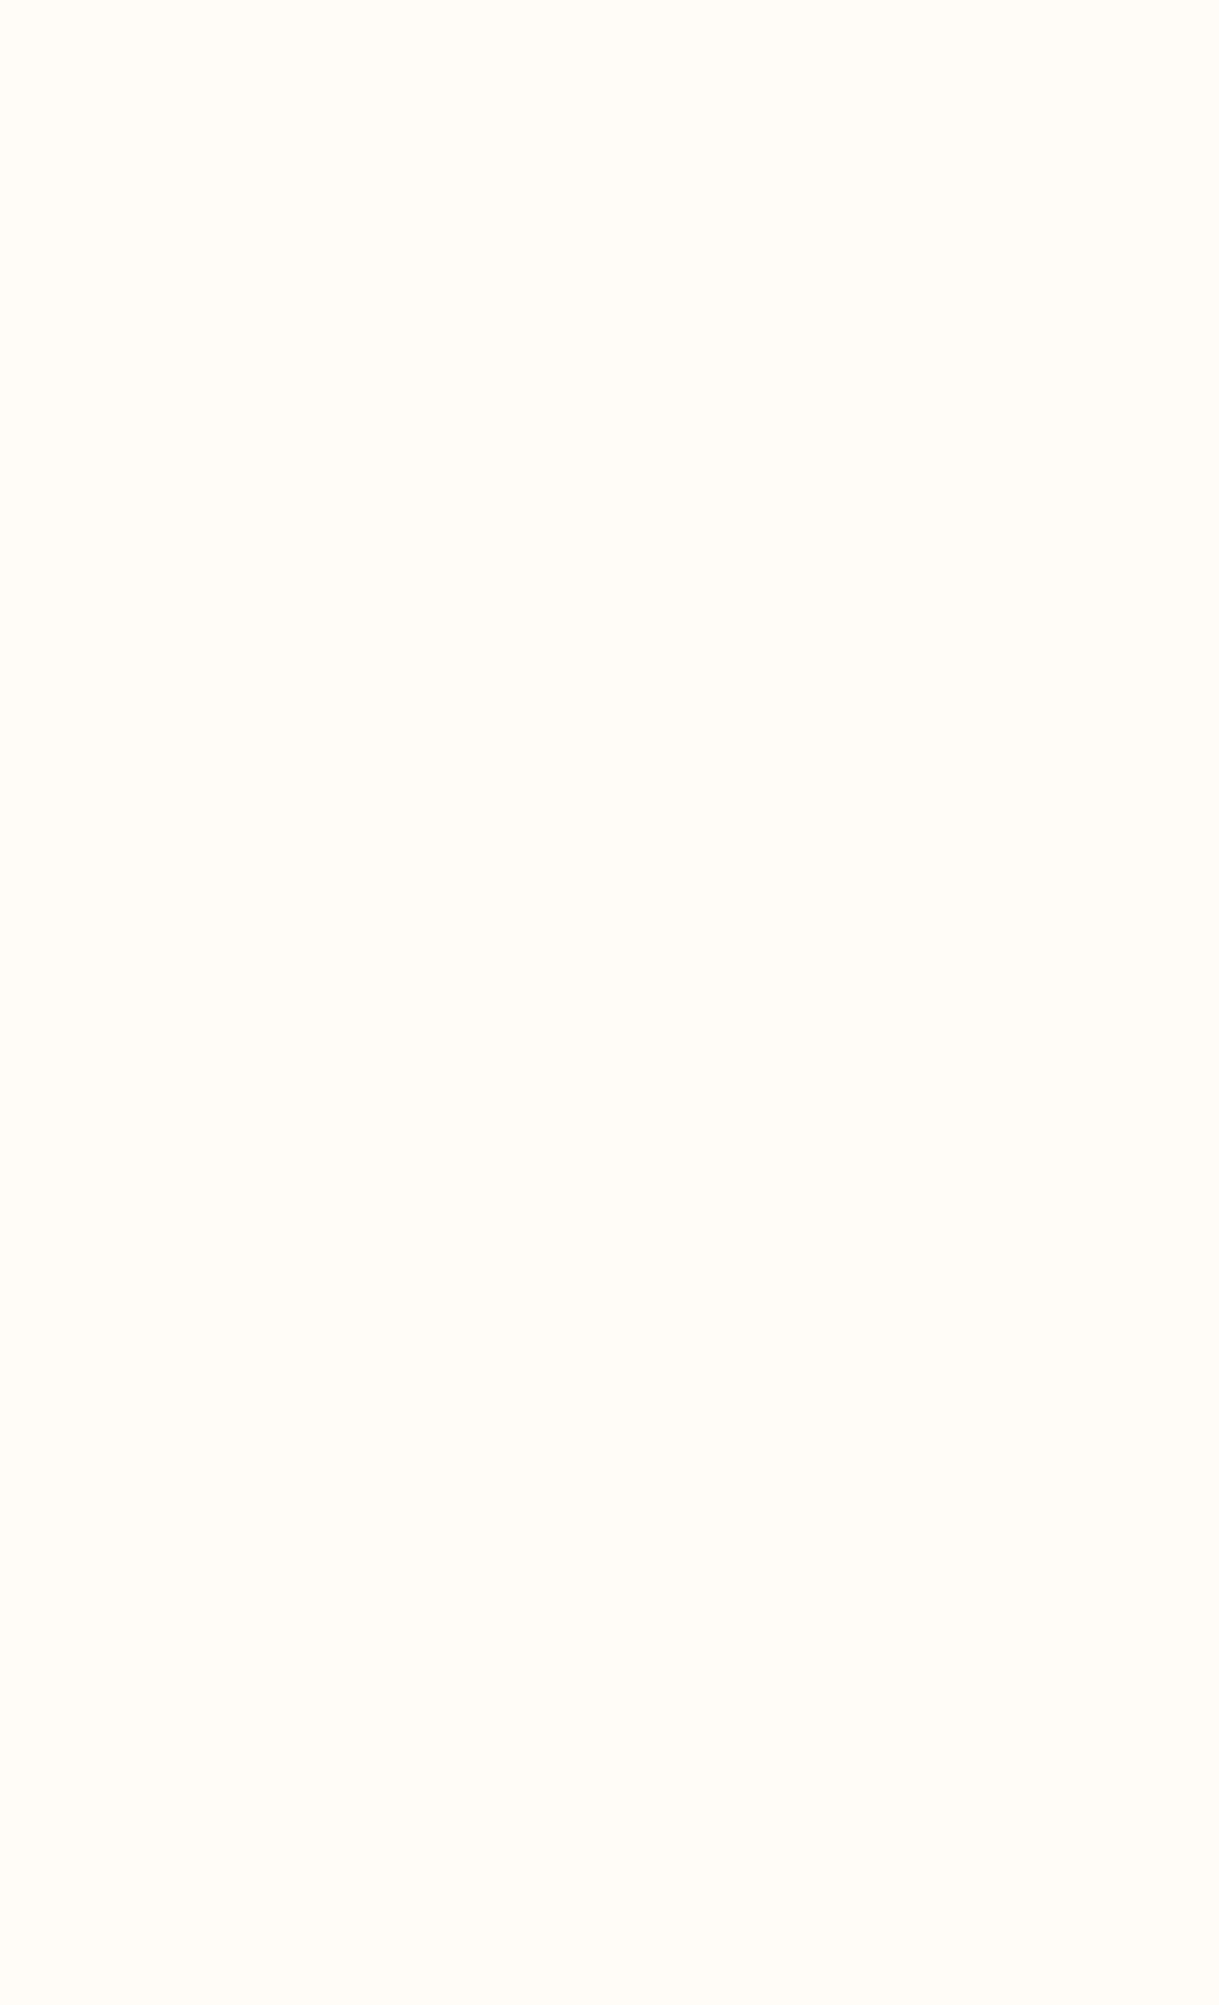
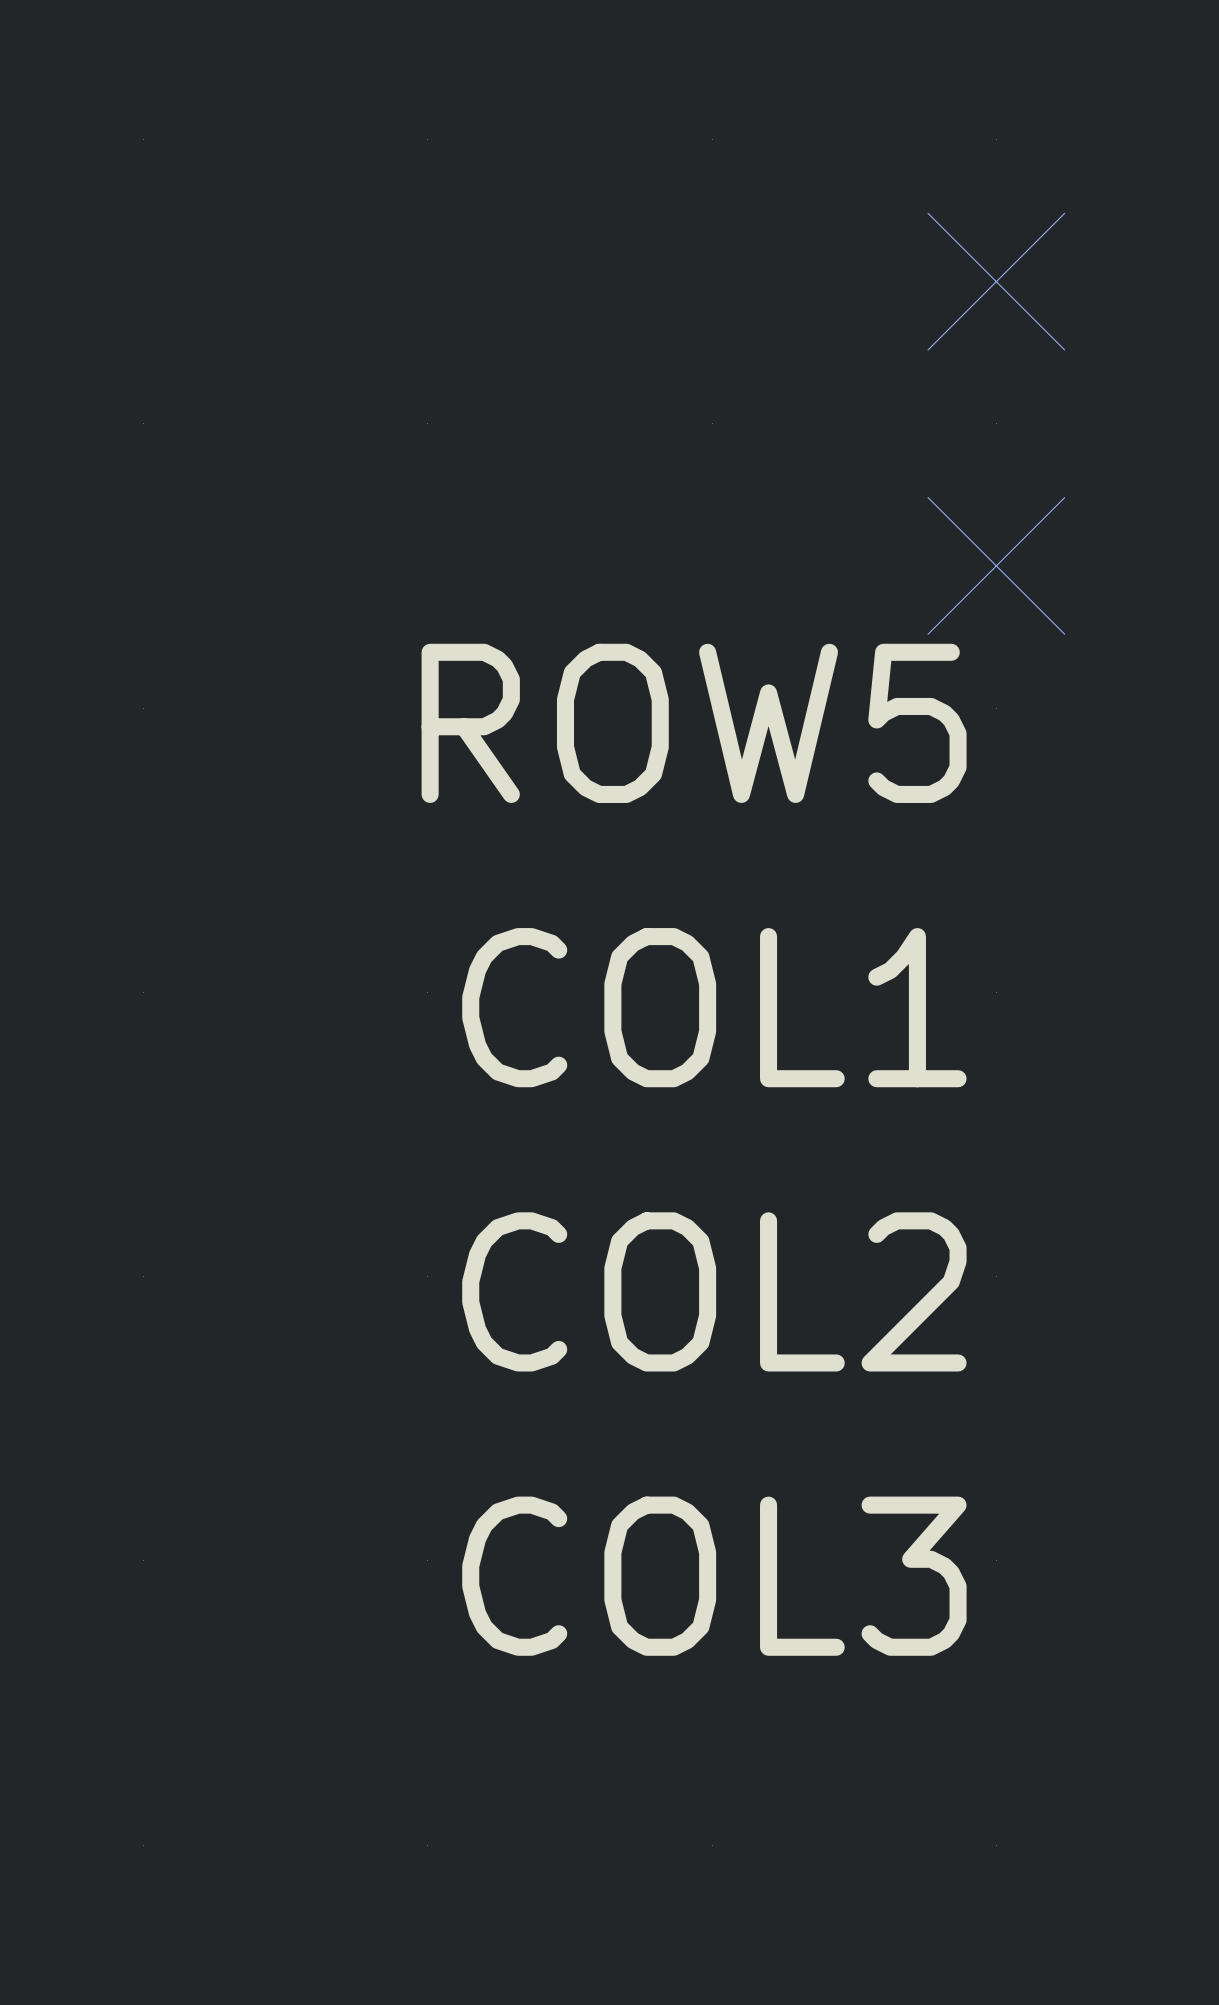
no-connect mark: none -> (996, 281)
no-connect mark: none -> (996, 565)
label: none -> ROW5 (694, 723)
label: none -> COL1 (714, 1007)
label: none -> COL2 (714, 1291)
label: none -> COL3 (714, 1576)

